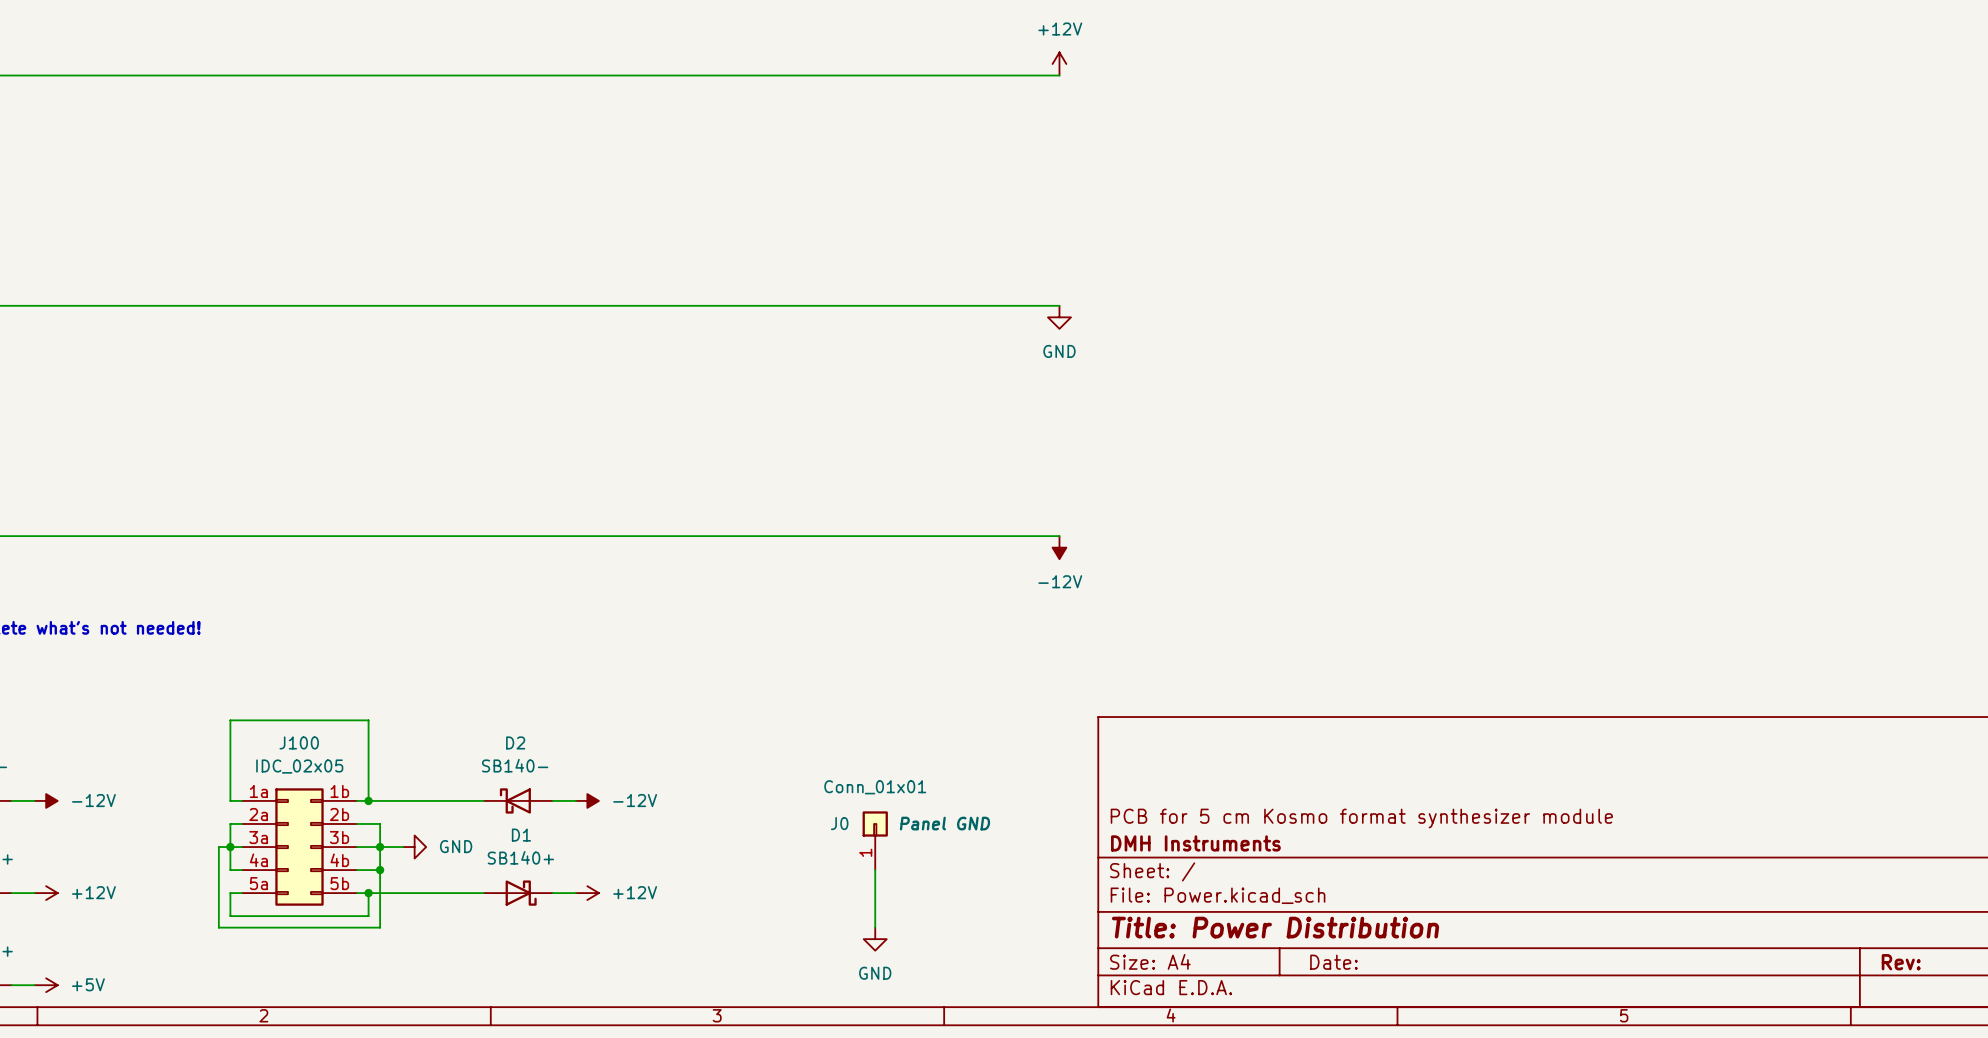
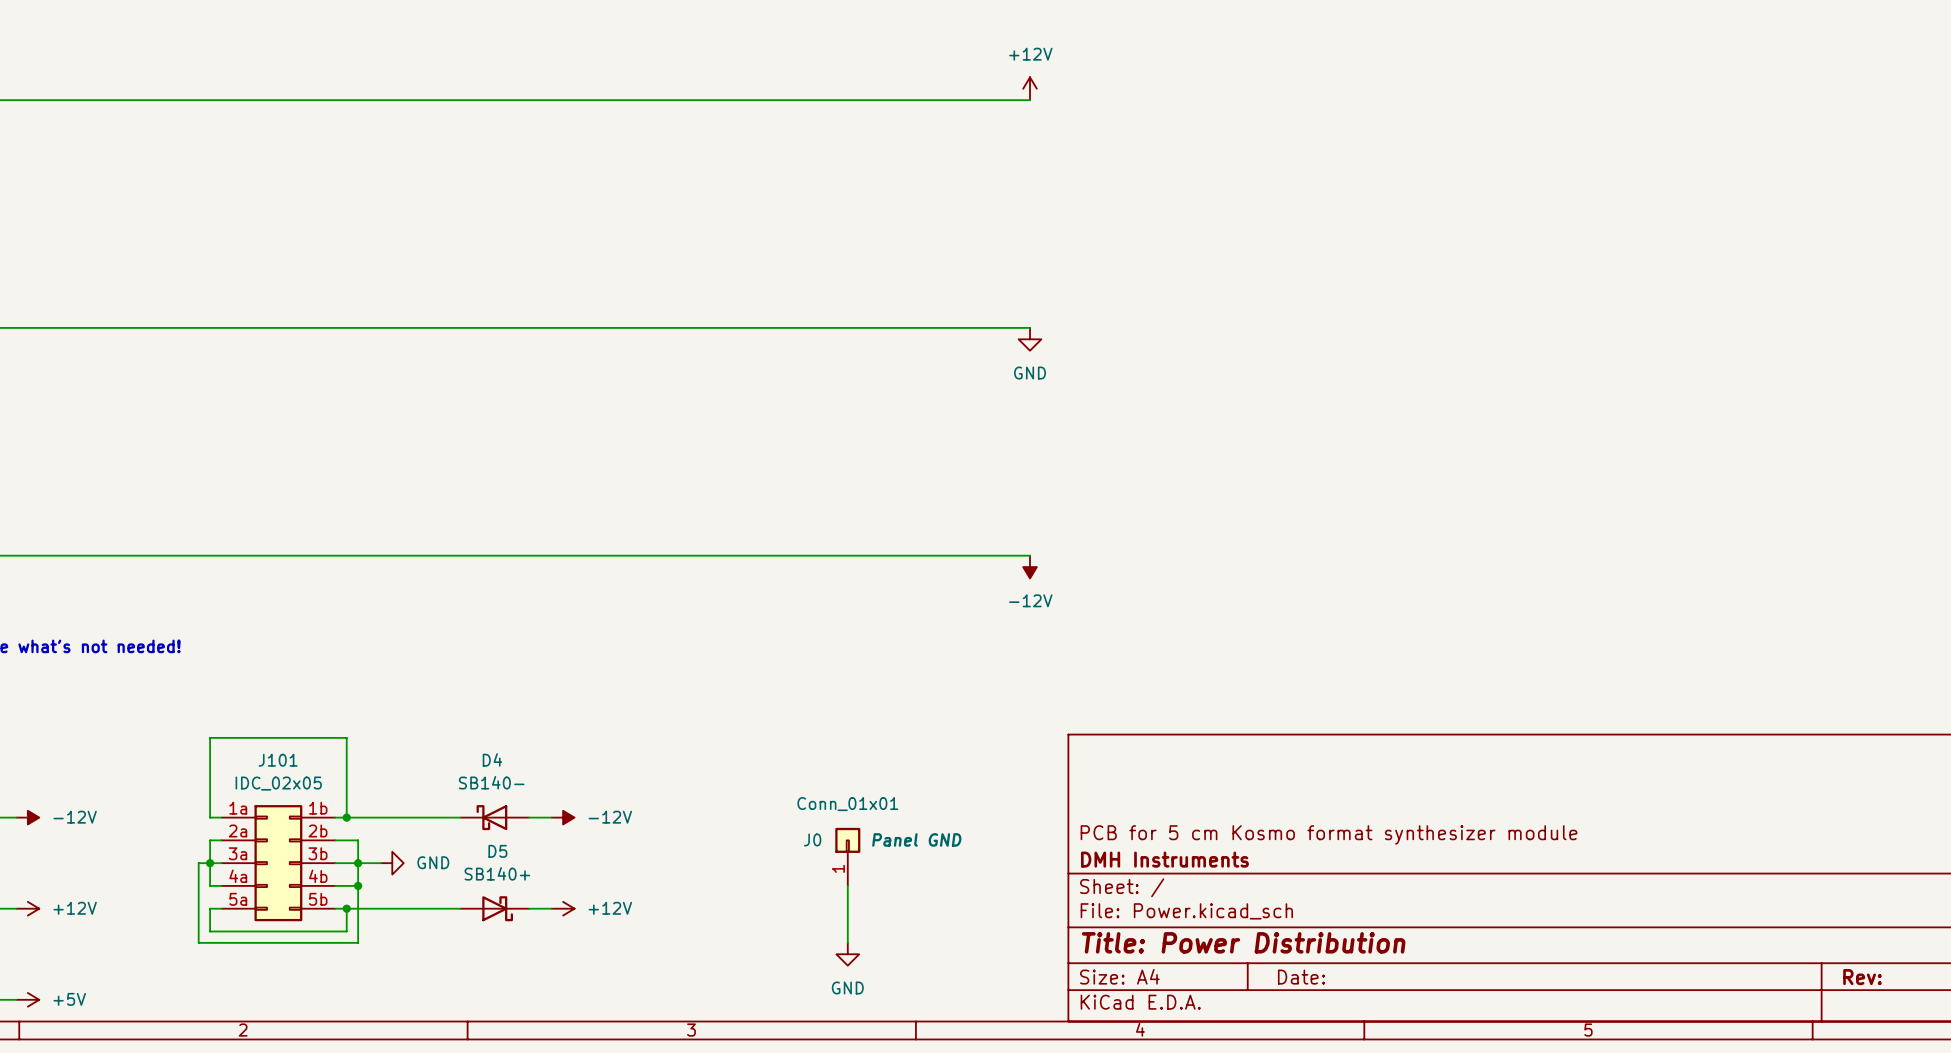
J100 name: J100 (299, 742) -> J101 (278, 760)
D2 name: D2 (515, 742) -> D4 (492, 759)
D1 name: D1 (521, 835) -> D5 (497, 851)

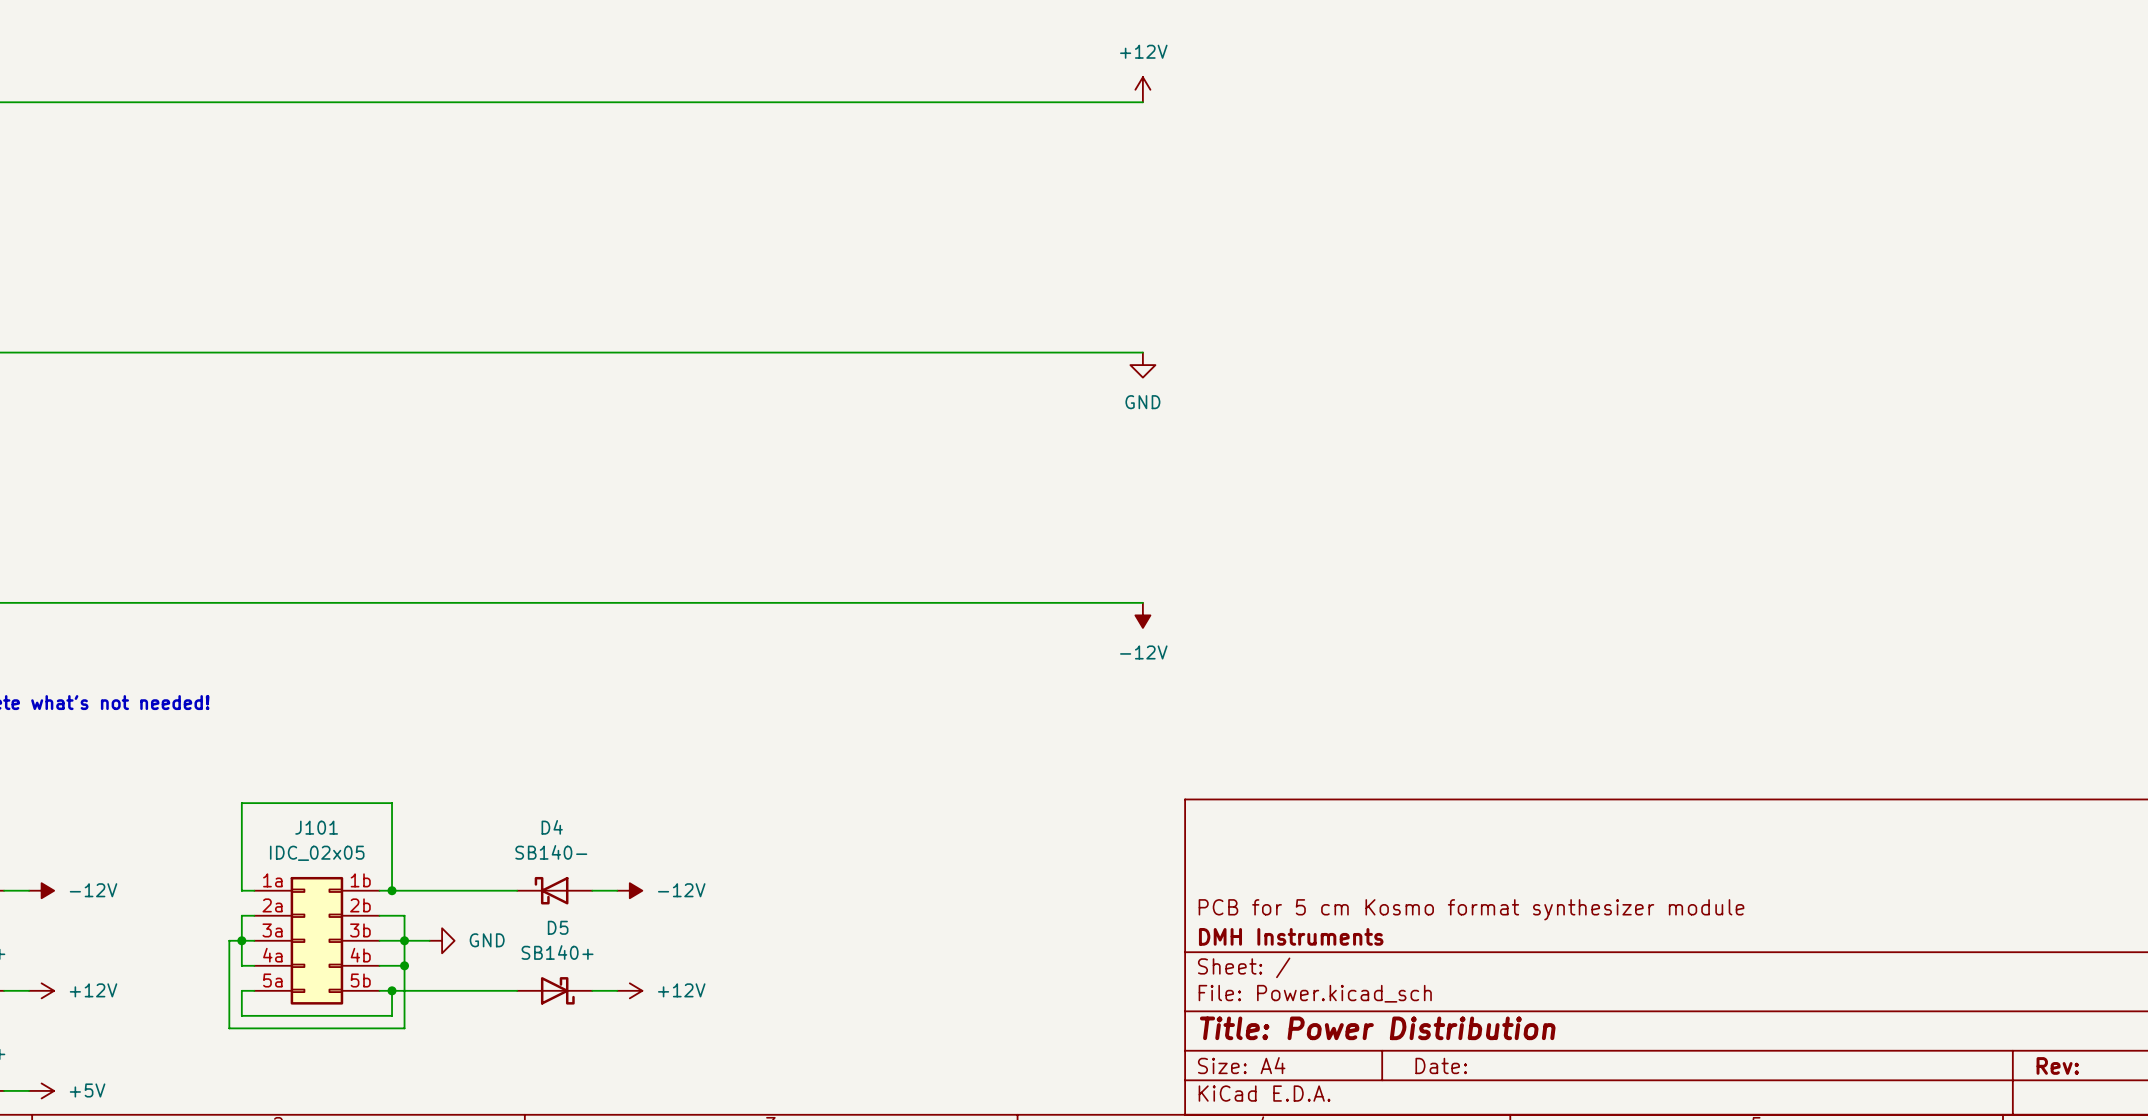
J0: Conn_01x01 (847, 856) -> none
wire: (847, 885) (847, 942) -> none
power symbol: GND (847, 954) -> none

